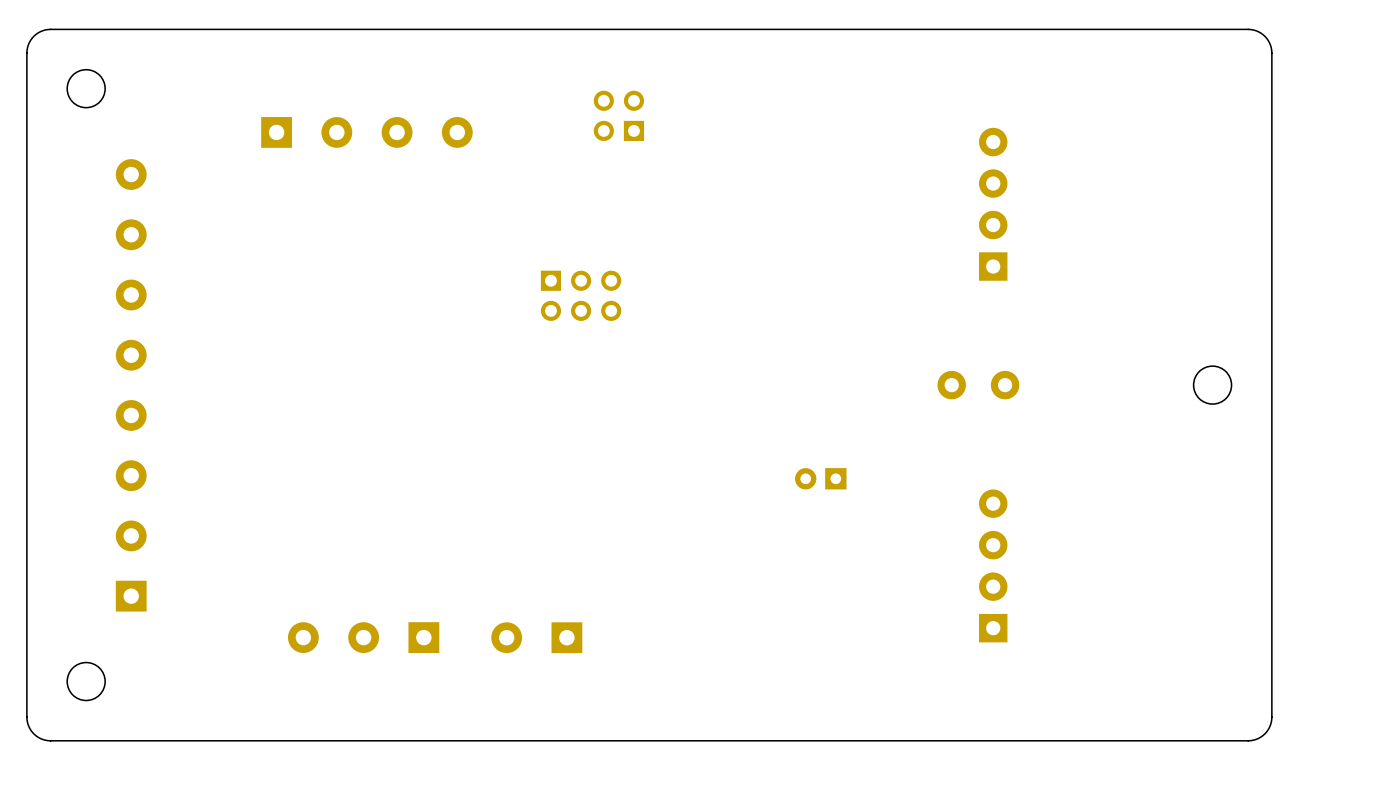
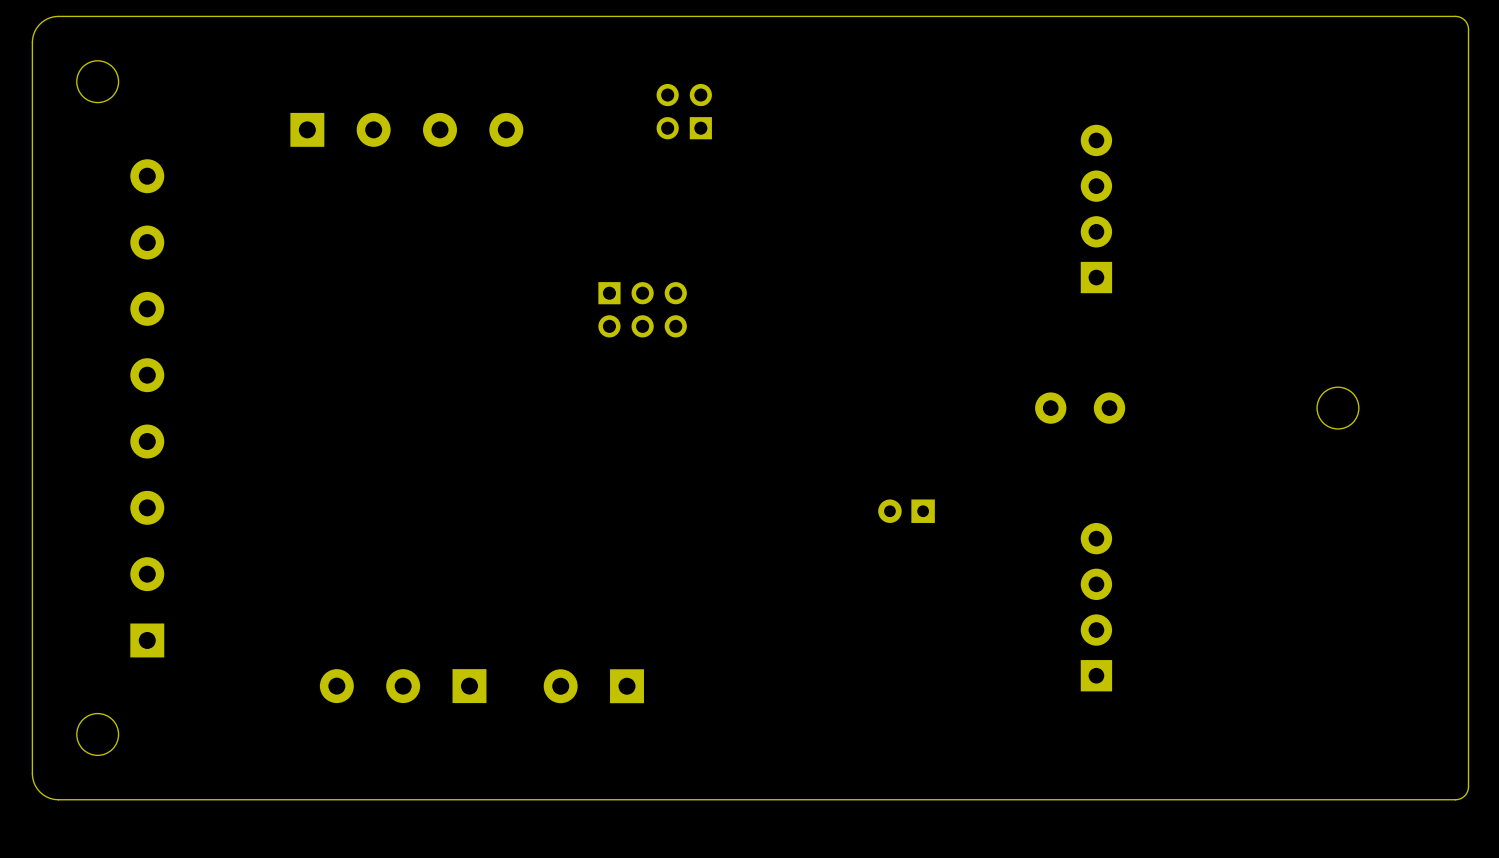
board edge: (1248, 29) (1258, 31) (1264, 36) (1269, 42) (1271, 53) (1271, 717) (1269, 727) (1264, 733) (1258, 738) (1248, 740) -> (1377, 16) (1456, 16) (1465, 21) (1468, 29) (1468, 788) (1464, 795) (1456, 799) (1377, 799)

